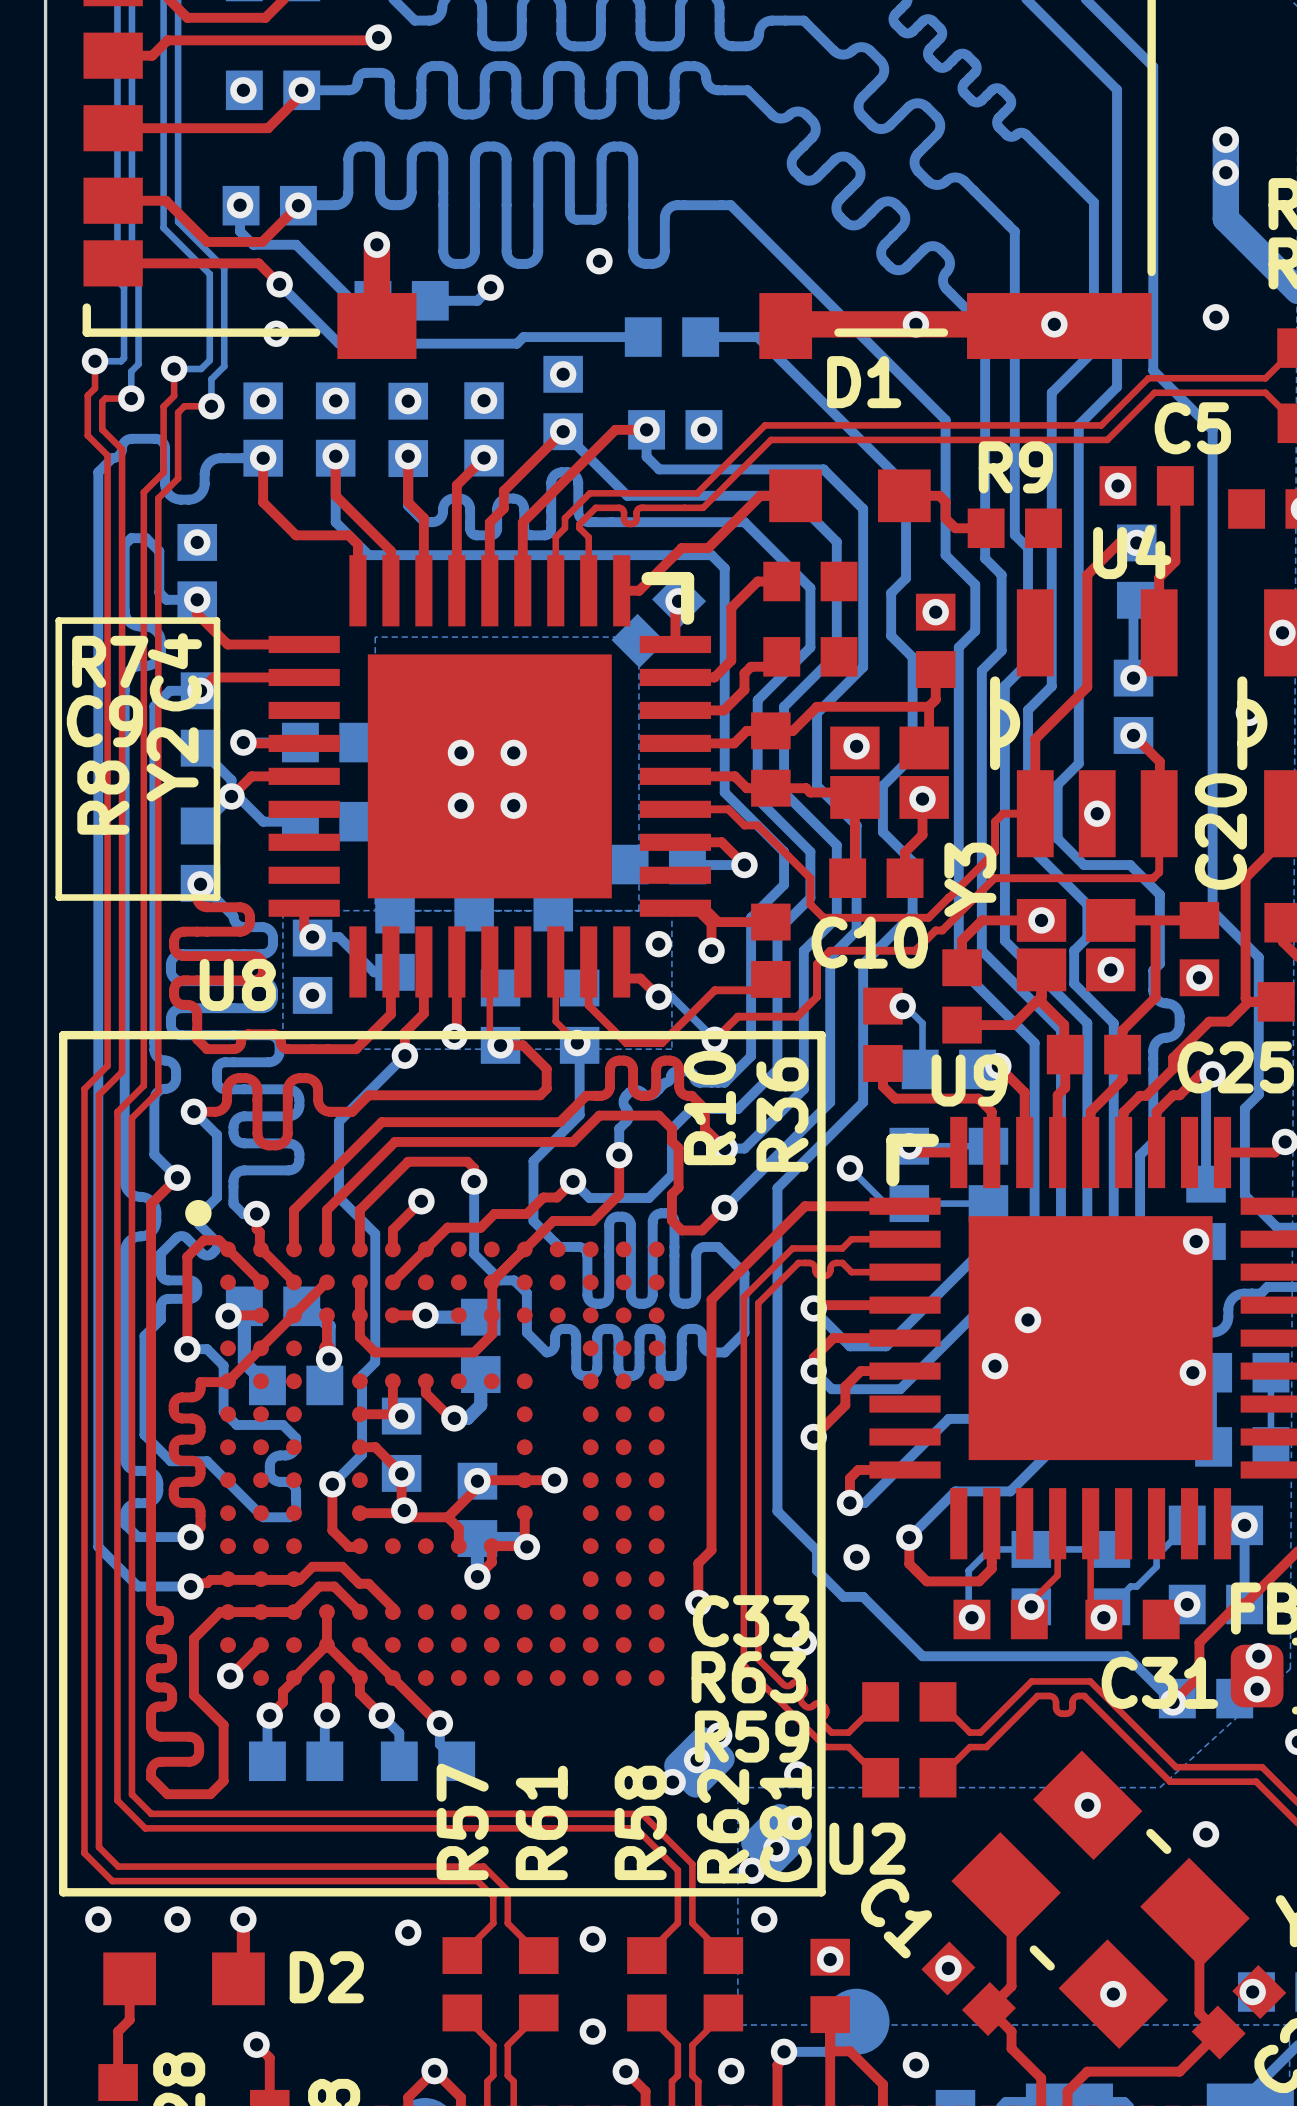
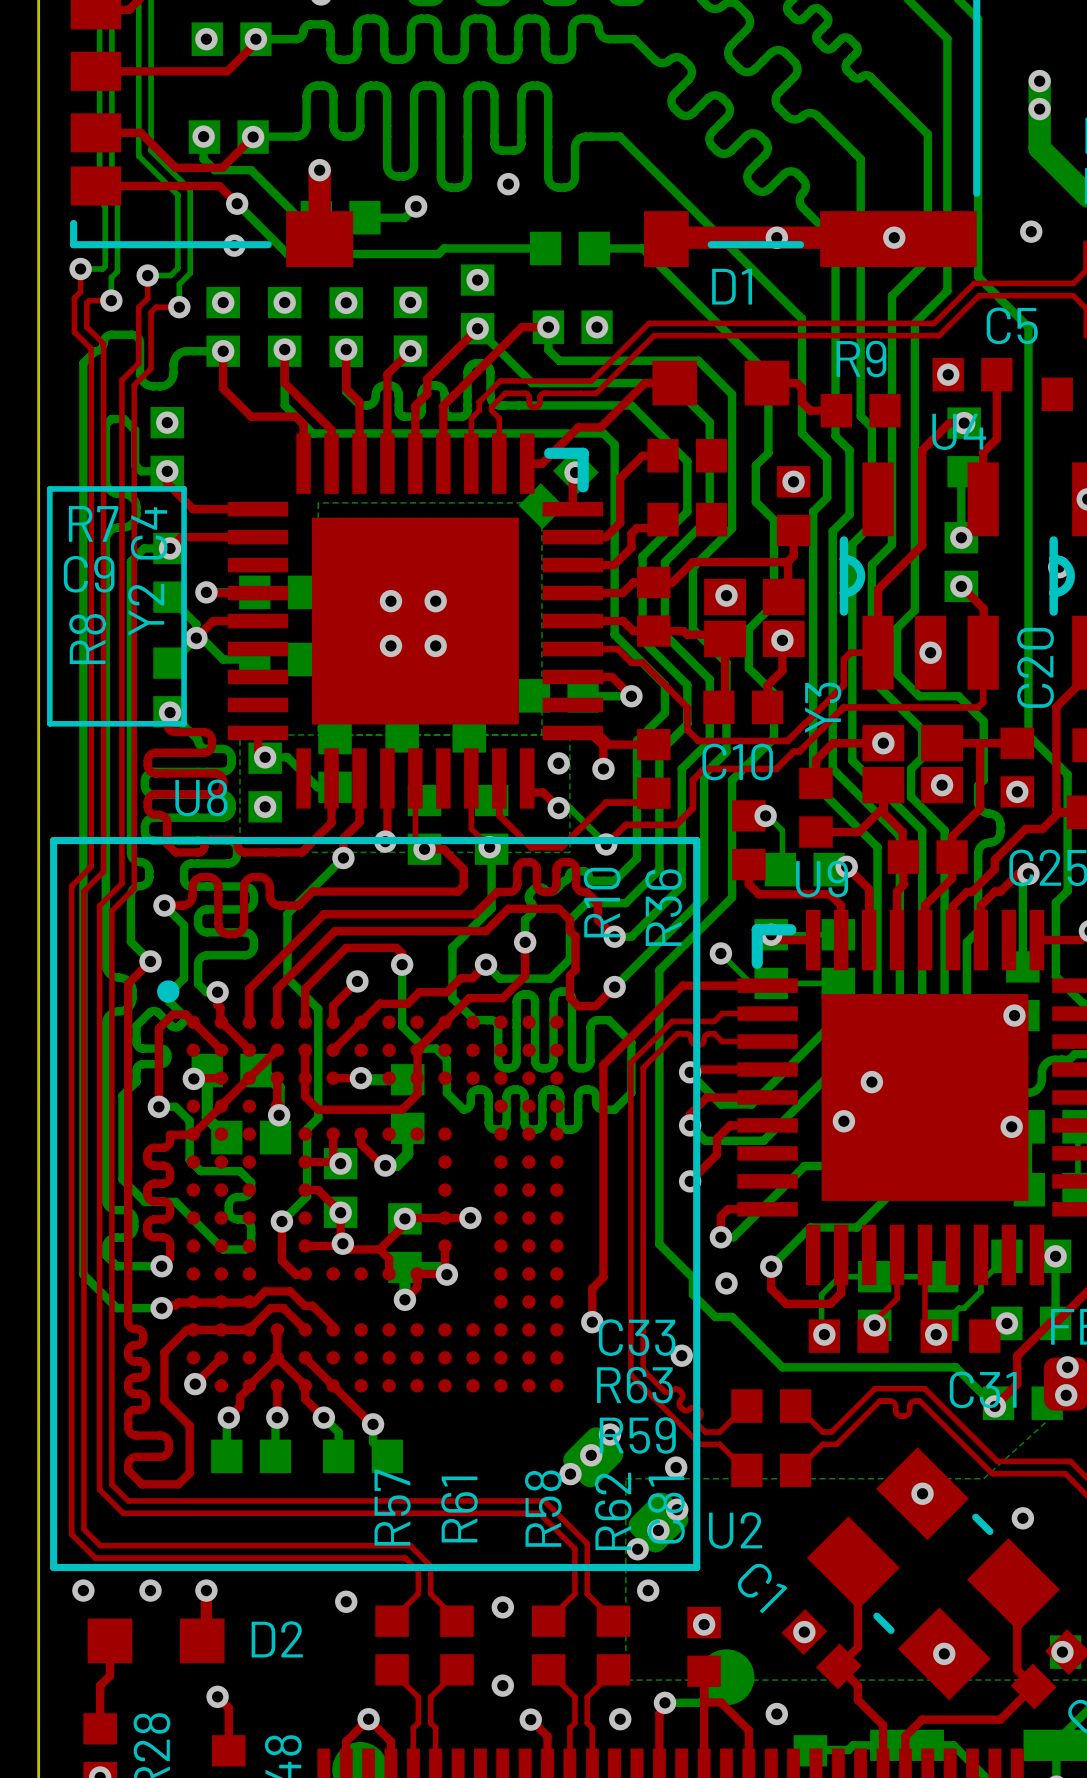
bottom track: (335, 205) (343, 202) (348, 195) (349, 153) (354, 148) (361, 146) (371, 147) (378, 153) (380, 195) (383, 201) (391, 205) (403, 204) (410, 198) (411, 157) (415, 150) (421, 146) (430, 146) (440, 151) (443, 159) (443, 252) (446, 259) (453, 263) (467, 262) (474, 254) (475, 157) (477, 151) (484, 146) (499, 147) (506, 156) (506, 252) (509, 259) (516, 263) (531, 262) (537, 254) (538, 157) (541, 151) (546, 147) (561, 147) (568, 153) (569, 213) (572, 218) (577, 219) (595, 219) (601, 214) (601, 159) (604, 151) (610, 147) (620, 146) (630, 151) (633, 159) (633, 252) (635, 259) (641, 263) (656, 263) (663, 256) (664, 216) (667, 209) (674, 205) (690, 205) -> (284, 136) (298, 136) (304, 131) (306, 93) (310, 87) (317, 85) (327, 86) (332, 92) (333, 127) (335, 132) (343, 136) (354, 135) (360, 127) (361, 91) (367, 86) (379, 86) (384, 89) (387, 95) (387, 169) (394, 175) (406, 175) (411, 172) (413, 166) (414, 92) (421, 86) (433, 86) (438, 89) (440, 95) (441, 179) (446, 186) (459, 187) (464, 184) (467, 178) (467, 93) (471, 87) (478, 85) (488, 86) (493, 92) (494, 144) (497, 149) (501, 150) (516, 150) (520, 146) (521, 96) (523, 89) (532, 85) (541, 86) (545, 89) (548, 96) (548, 178) (554, 186) (566, 187) (573, 182) (575, 144) (579, 138) (585, 136)

